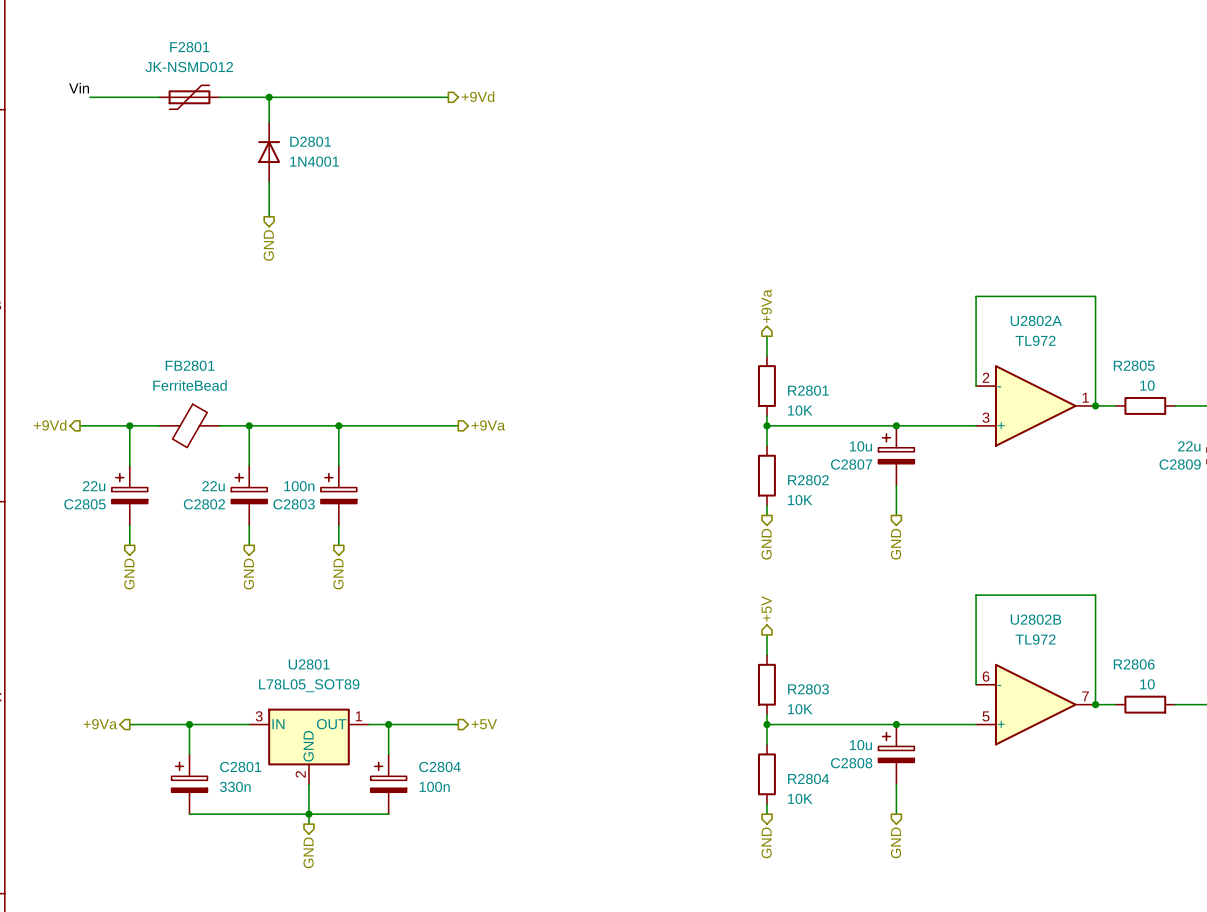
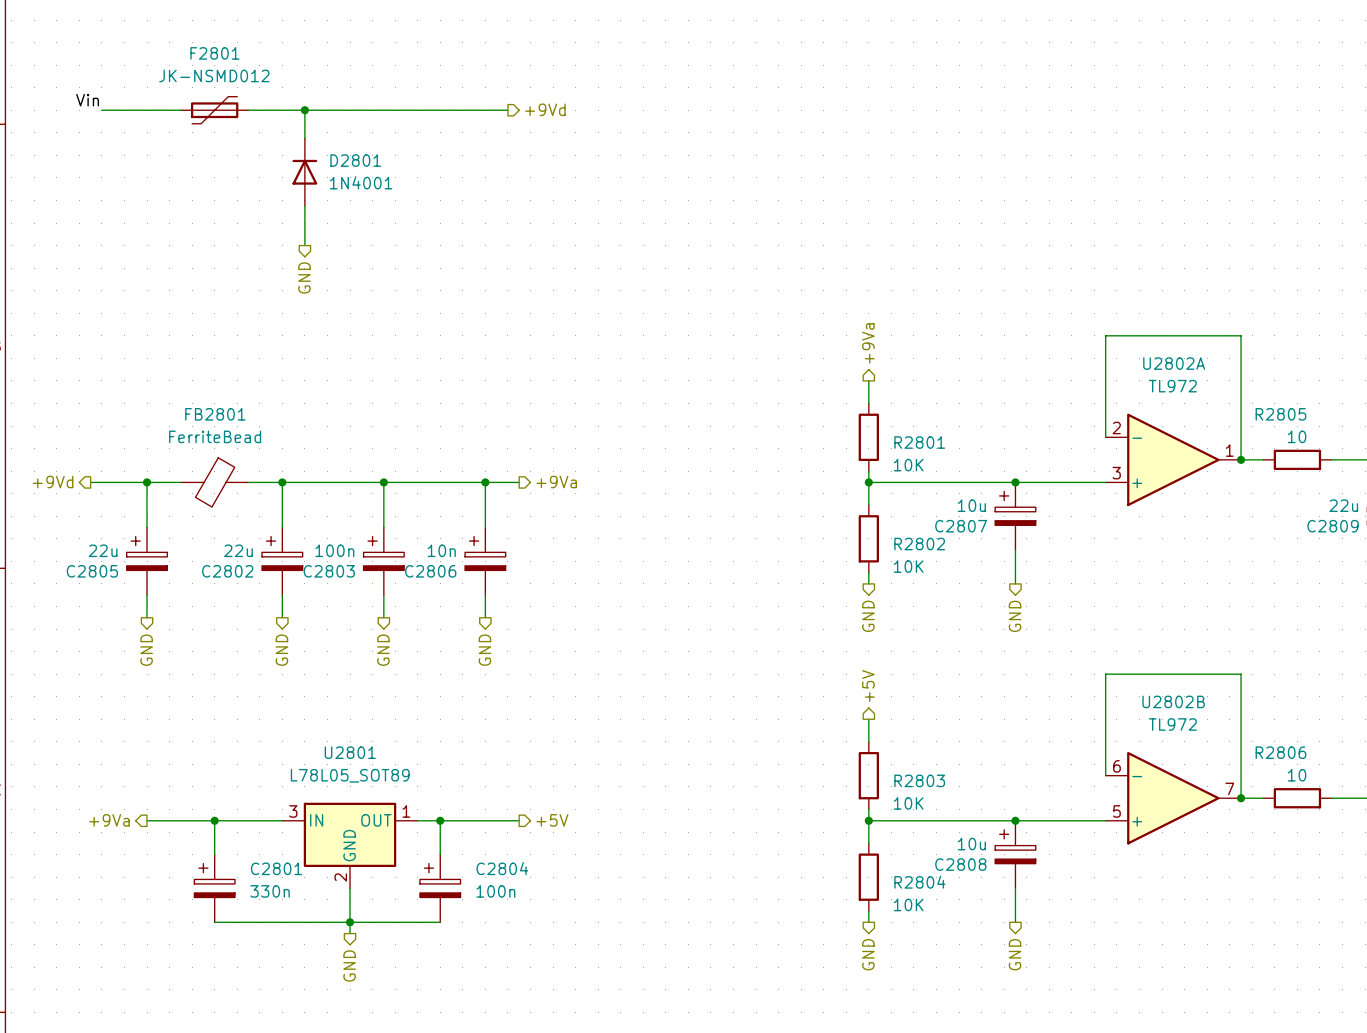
wire: none -> (485, 482) (485, 527)
junction: none -> (485, 482)
C2806: none -> 10n (485, 561)
wire: none -> (485, 595) (485, 617)
hierarchical label: none -> GND (484, 650)

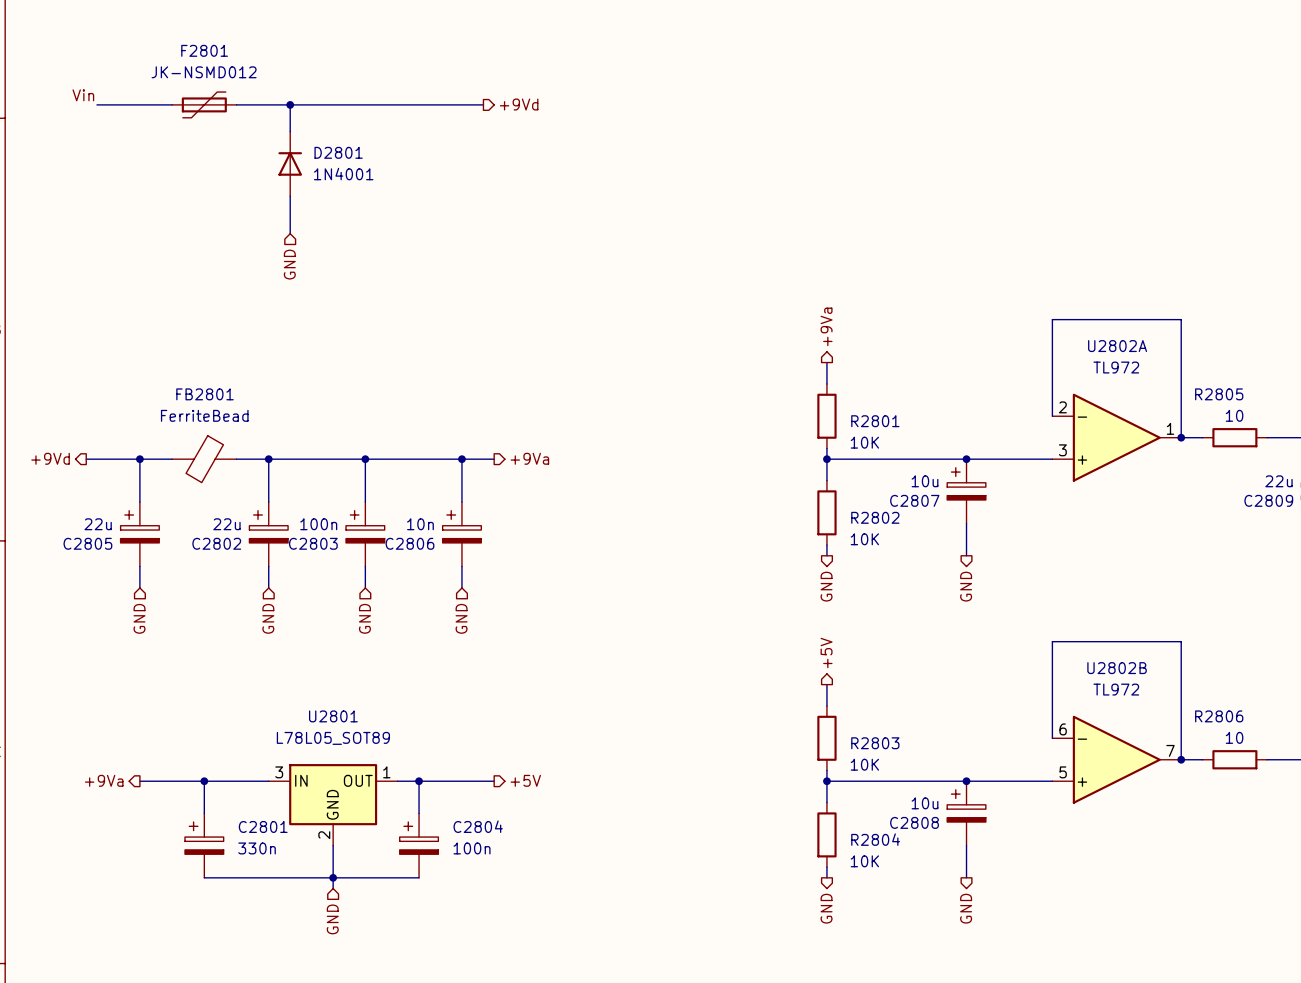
hierarchical label shape: output (304, 277) -> input (289, 264)
hierarchical label shape: output (146, 650) -> input (139, 618)
hierarchical label shape: output (281, 650) -> input (268, 618)
hierarchical label shape: output (383, 650) -> input (364, 618)
hierarchical label shape: output (484, 650) -> input (461, 618)
hierarchical label shape: output (349, 965) -> input (332, 919)

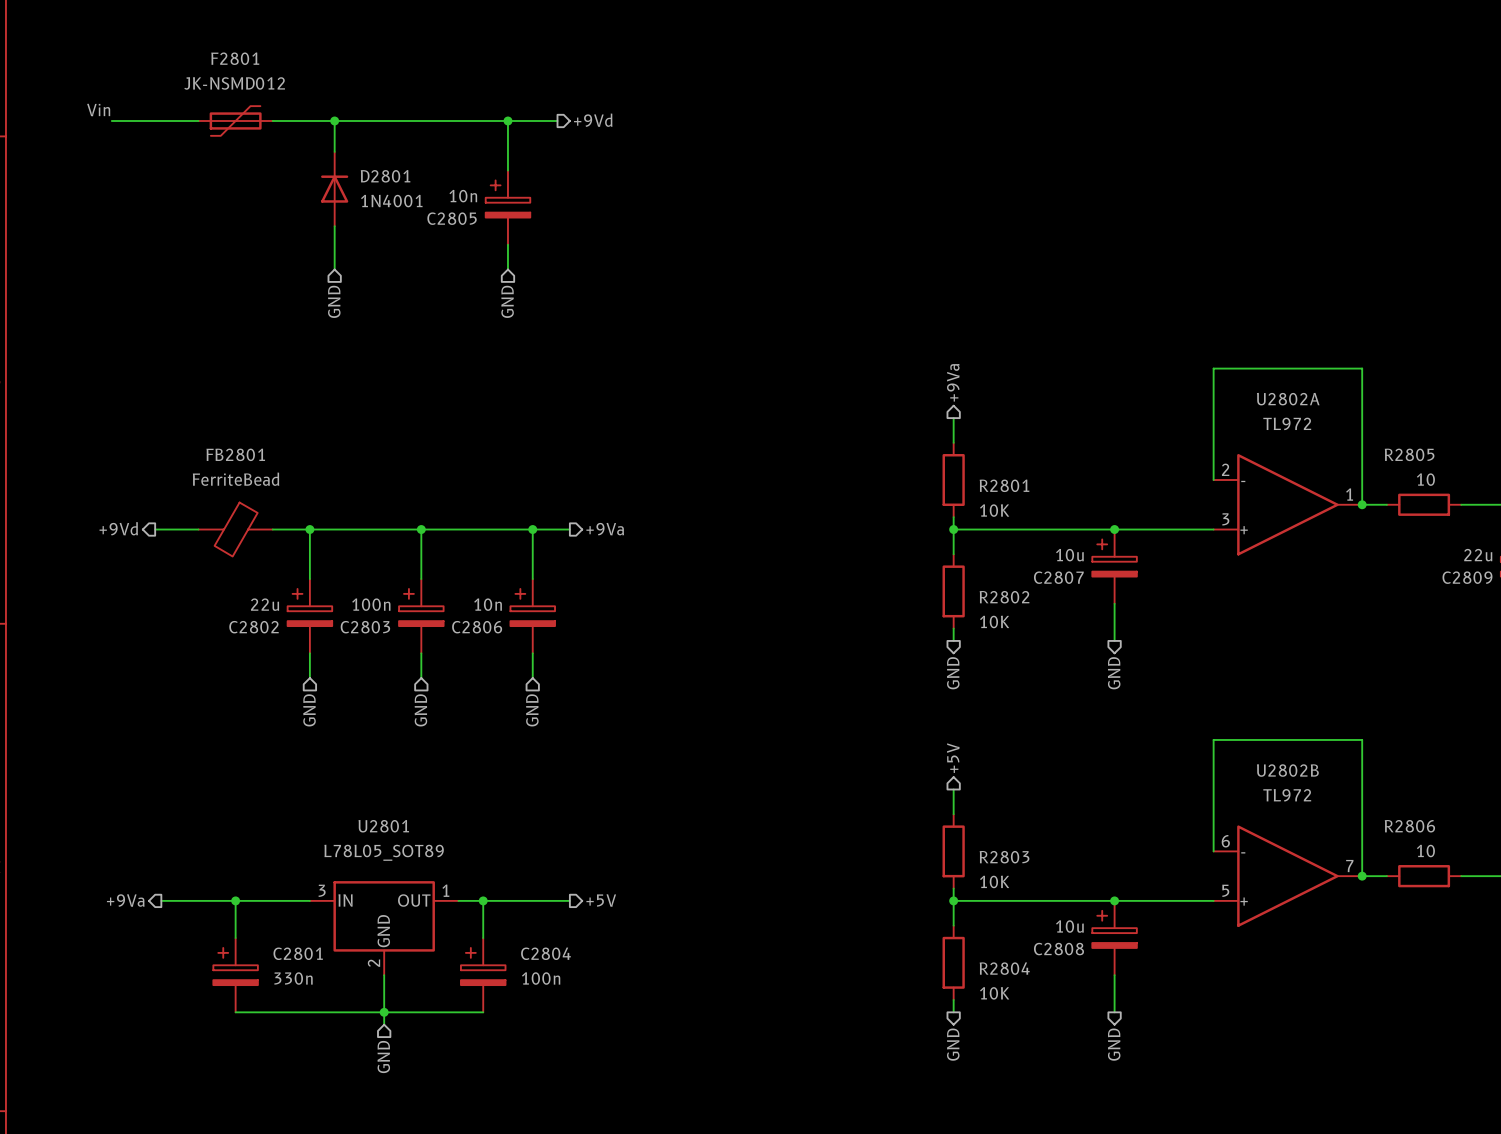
wire: none -> (507, 120) (507, 170)
junction: none -> (507, 120)
wire: none -> (507, 244) (507, 269)
hierarchical label: none -> GND (507, 301)
hierarchical label position: +9Vd (50, 458) -> +9Vd (118, 528)
wire: (86, 459) (134, 459) -> none
wire: (139, 459) (139, 502) -> none
junction: (139, 459) -> none
C2805 value: 22u (98, 524) -> 10n (463, 196)
C2805 position: (139, 534) -> (507, 207)
wire: (139, 566) (139, 587) -> none
hierarchical label: GND (139, 618) -> none

